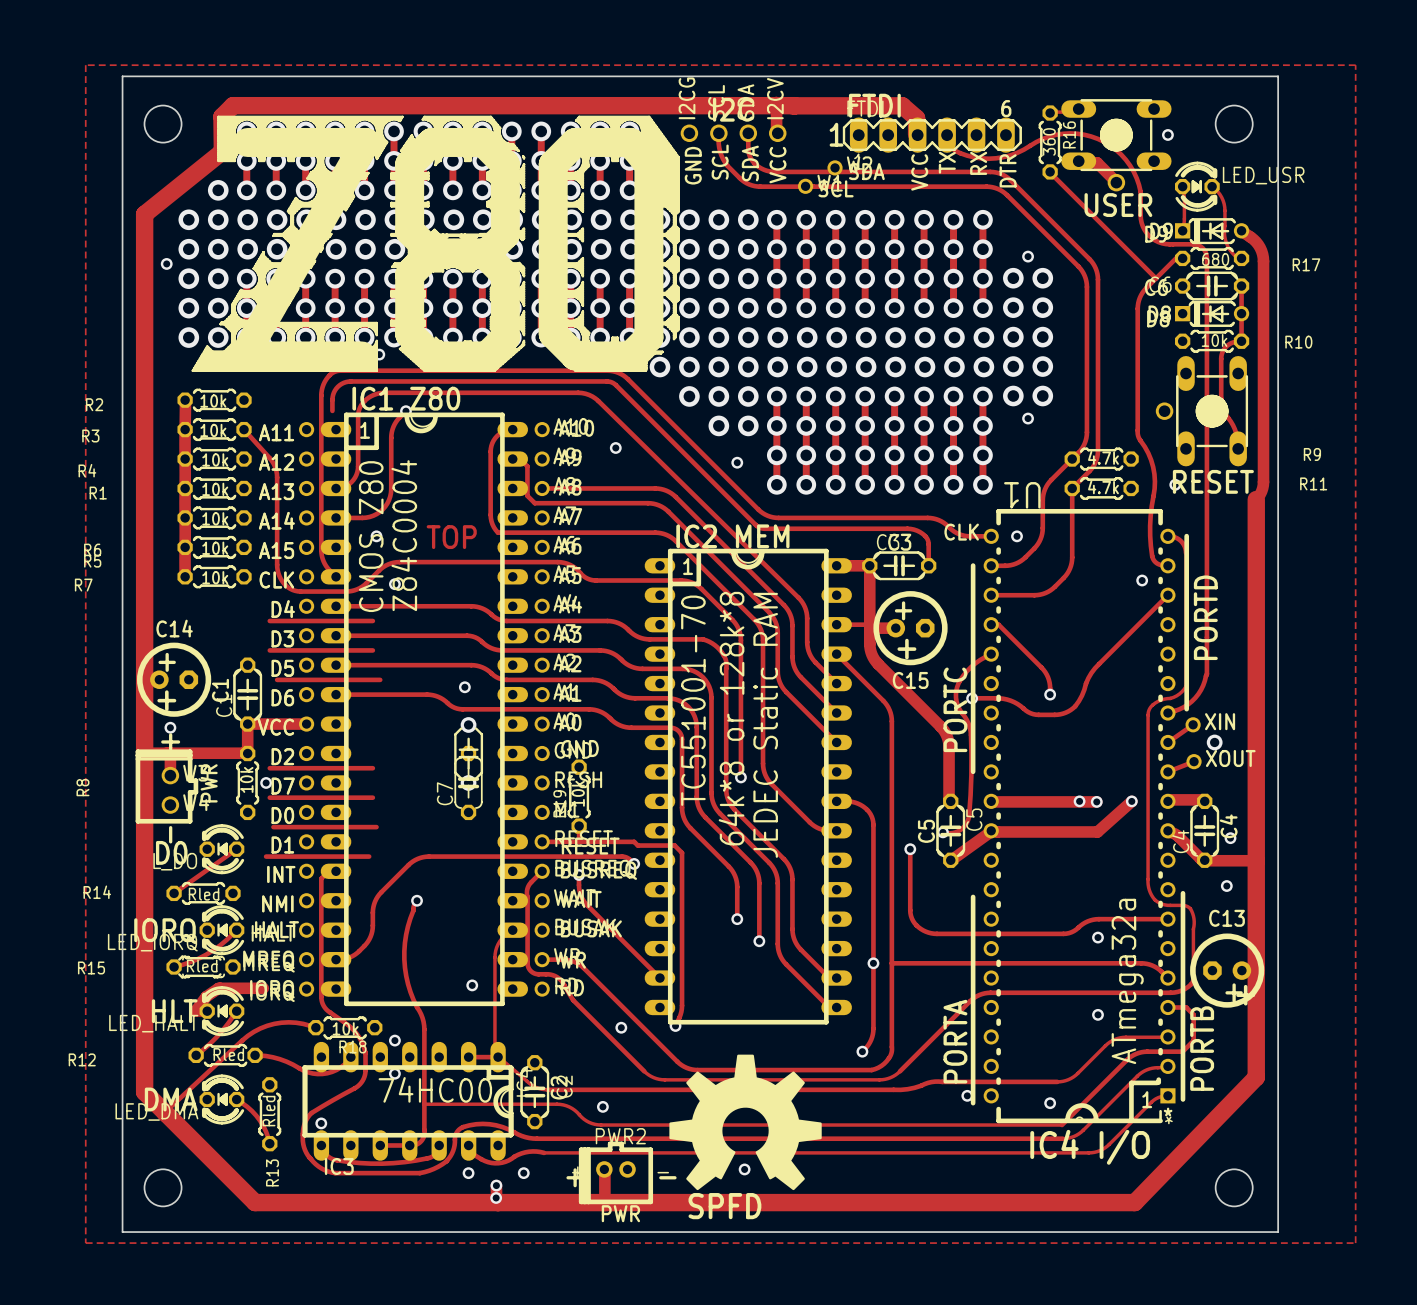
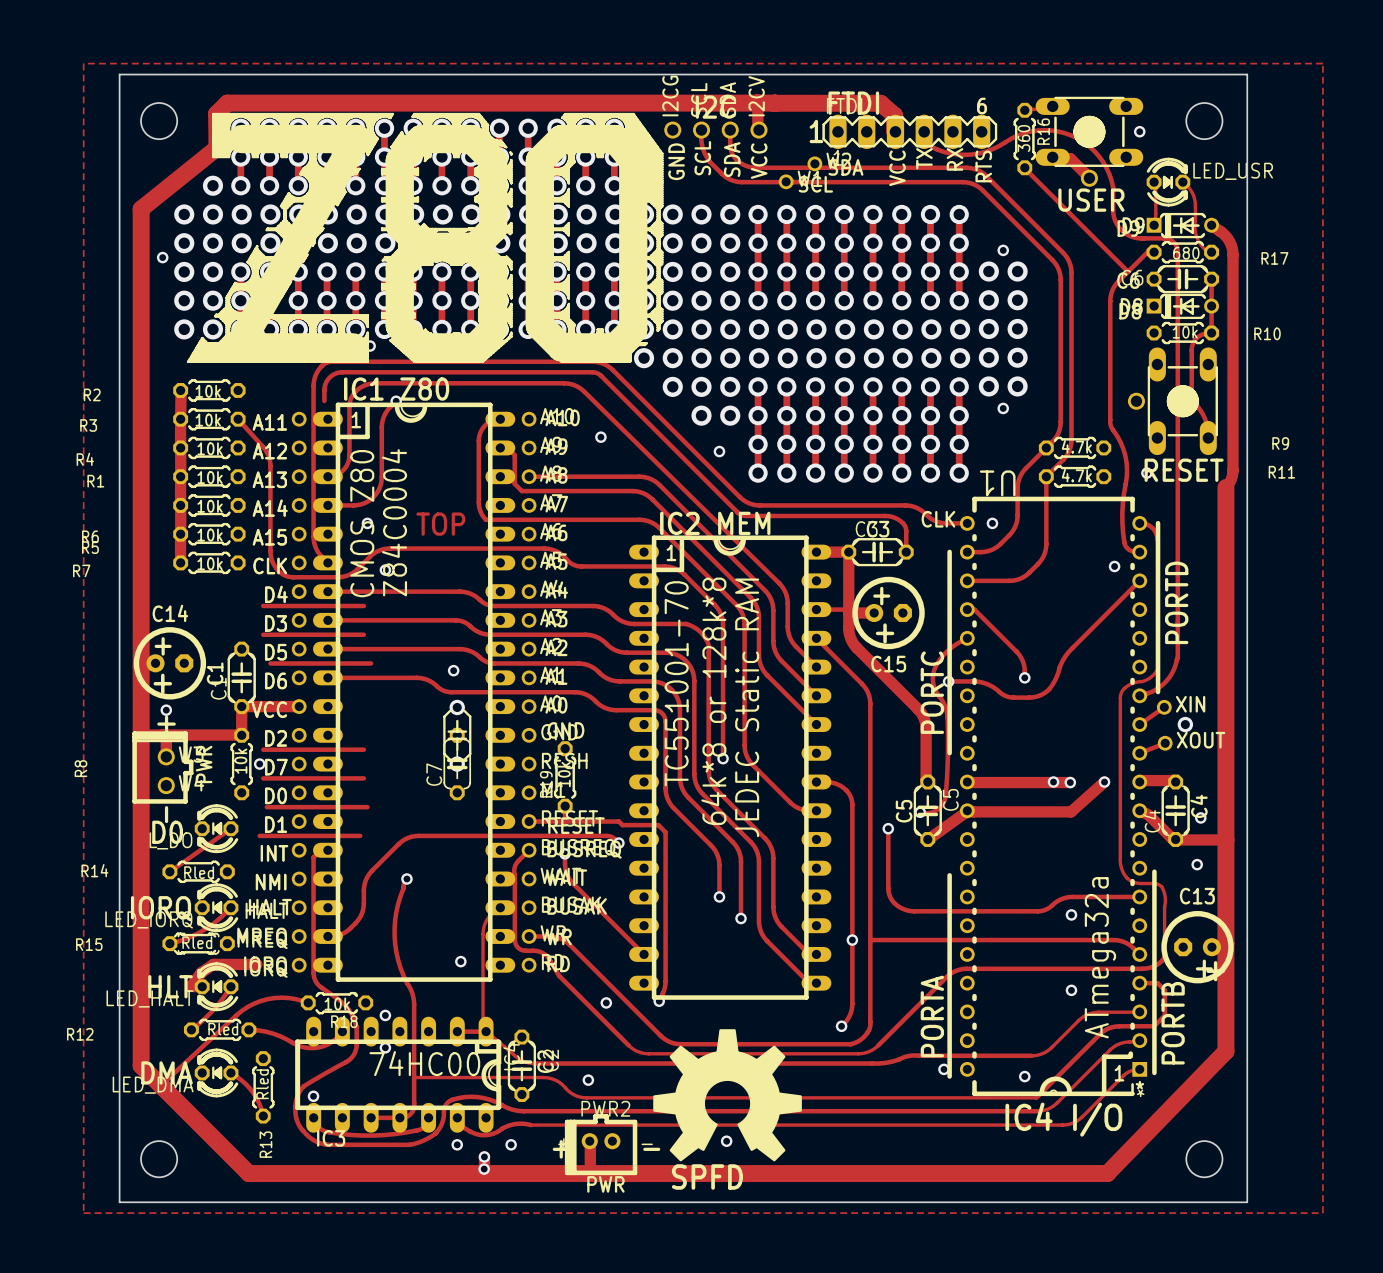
text: DTR (1008, 170) -> RTS (983, 166)

